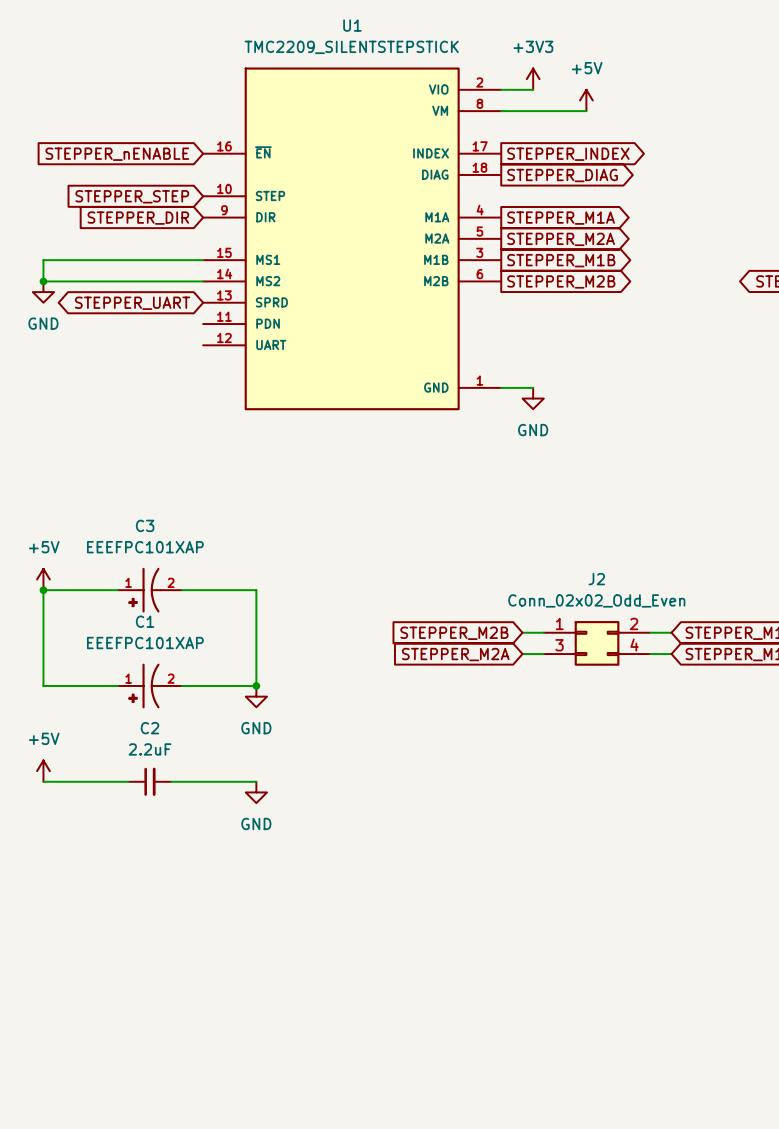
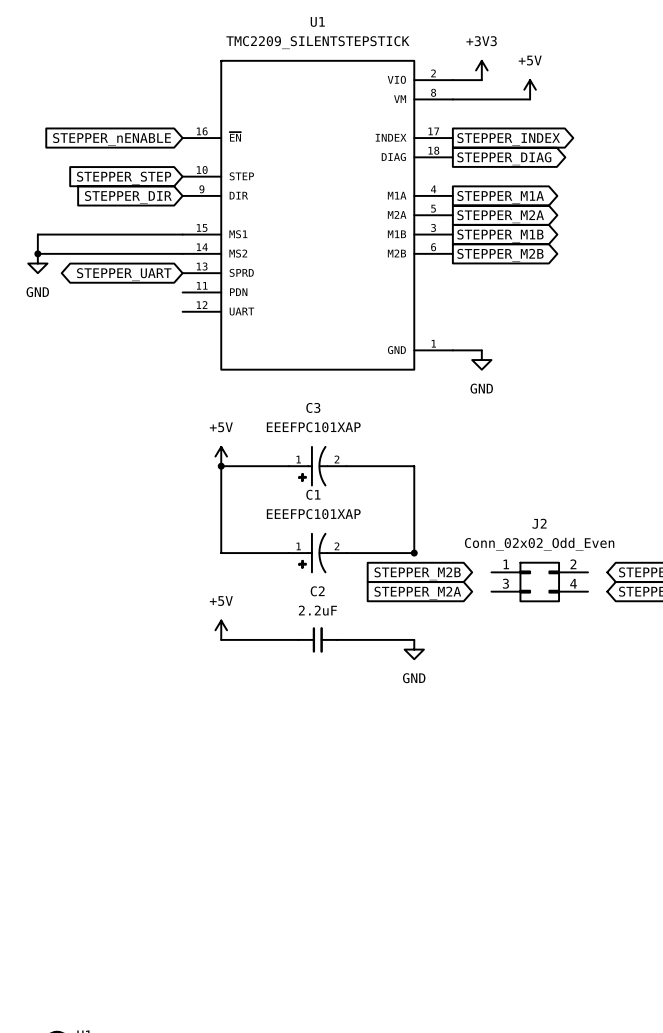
power symbol: none -> +5V (221, 456)
junction: none -> (221, 466)
wire: none -> (288, 466) (221, 466) (221, 553) (288, 553)
wire: none -> (346, 466) (414, 466) (414, 553) (346, 553)
power symbol: +5V (43, 579) -> none
junction: (43, 590) -> none
wire: (117, 590) (43, 590) (43, 685) (117, 685) -> none
C3 position: (149, 590) -> (317, 466)
wire: (181, 590) (256, 590) (256, 685) (181, 685) -> none
junction: none -> (414, 553)
wire: (522, 632) (543, 632) -> none
wire: (650, 632) (671, 632) -> none
wire: (522, 654) (543, 654) -> none
wire: (650, 654) (671, 654) -> none
C1 position: (149, 685) -> (317, 553)
junction: (256, 685) -> none
power symbol: none -> +5V (221, 630)
power symbol: GND (256, 696) -> none
wire: none -> (337, 639) (414, 639)
power symbol: none -> GND (414, 649)
power symbol: +5V (43, 771) -> none
wire: (43, 781) (128, 781) -> none
C2 position: (149, 781) -> (317, 639)
wire: (171, 781) (256, 781) -> (221, 639) (298, 639)
power symbol: GND (256, 792) -> none

